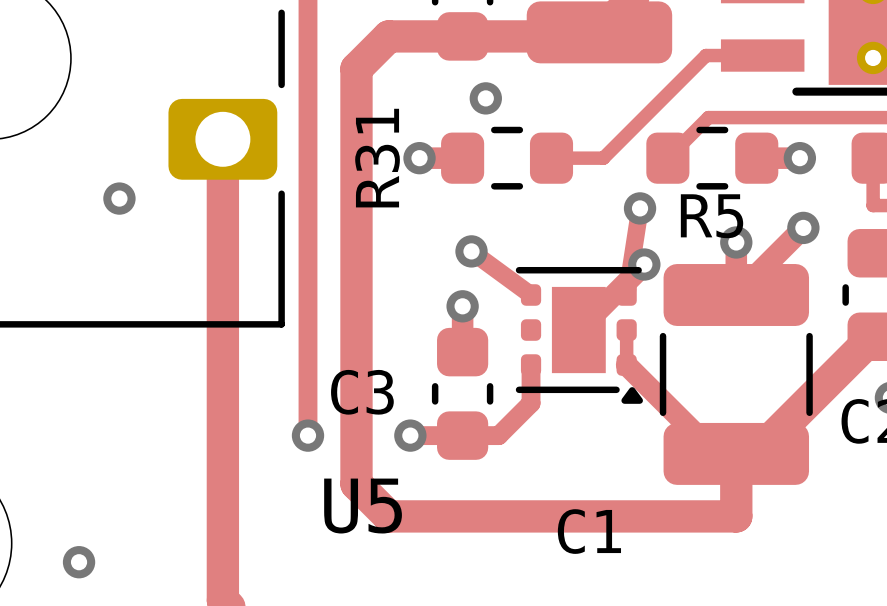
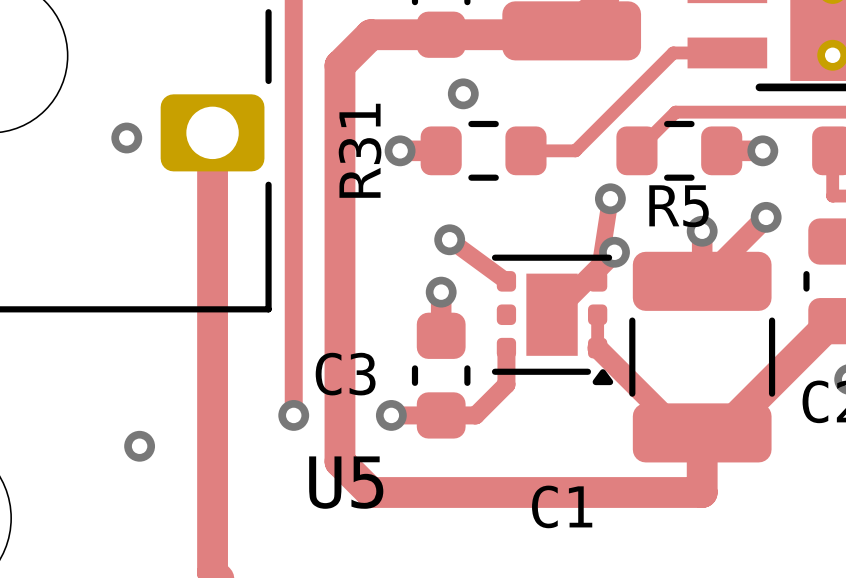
via position: (119, 198) -> (126, 137)
via position: (79, 562) -> (139, 446)

